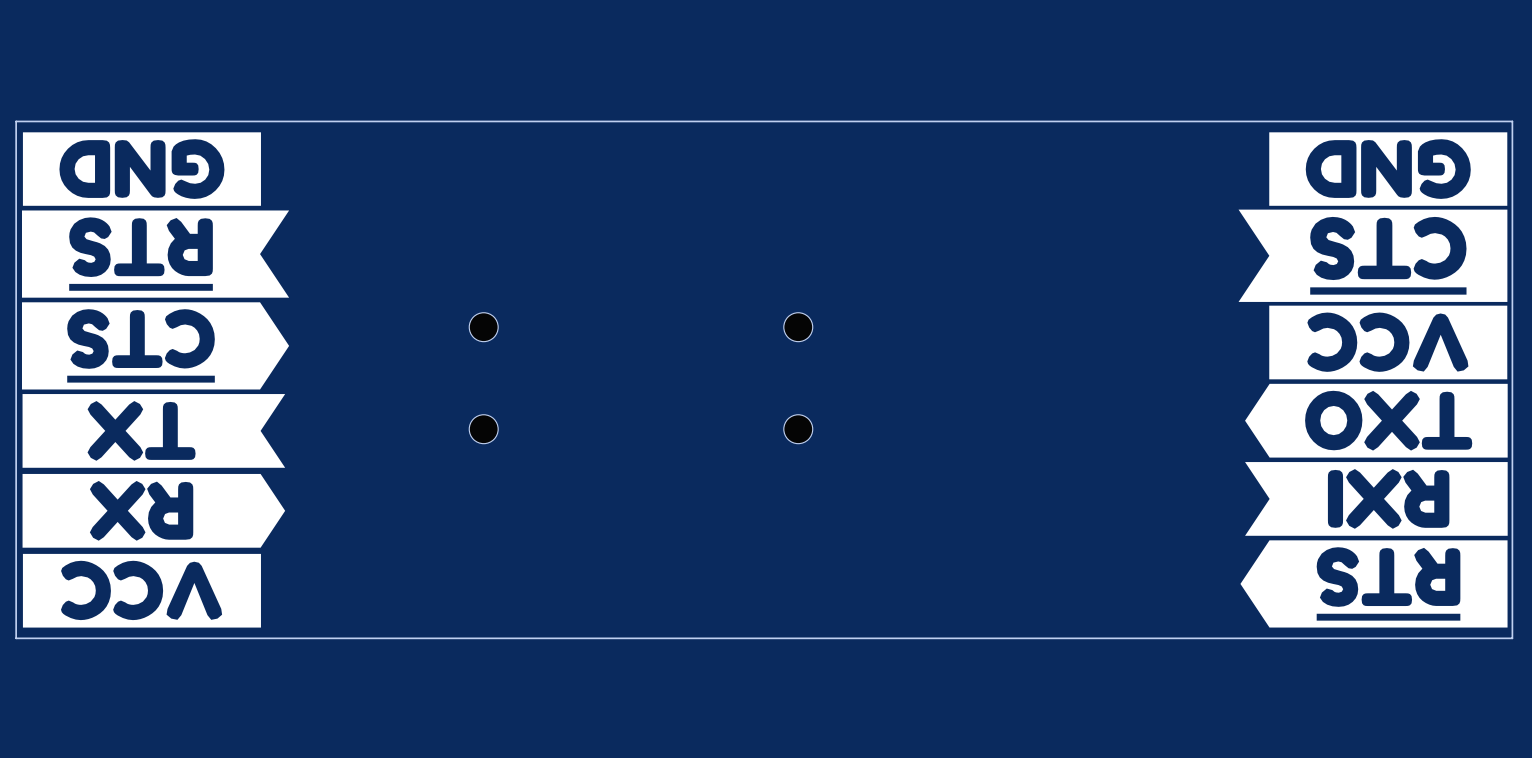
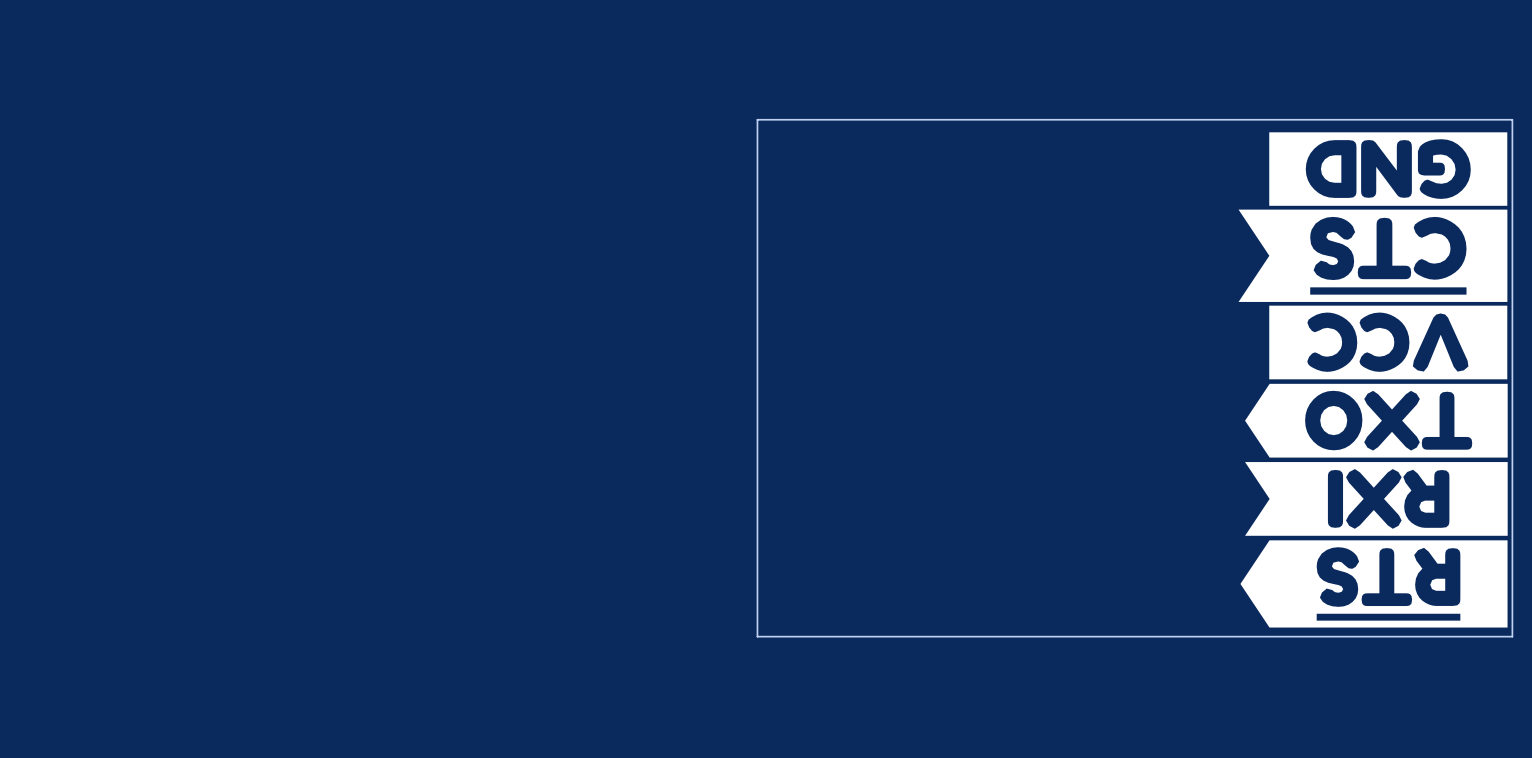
board edge: (1512, 121) (16, 121) (16, 638) (1512, 638) (1512, 636) -> (1512, 121) (1512, 119) (757, 119) (757, 636) (1512, 636)
drawing: [22, 132, 290, 628] -> none
part: (483, 378) -> none
part: (798, 378) -> none

